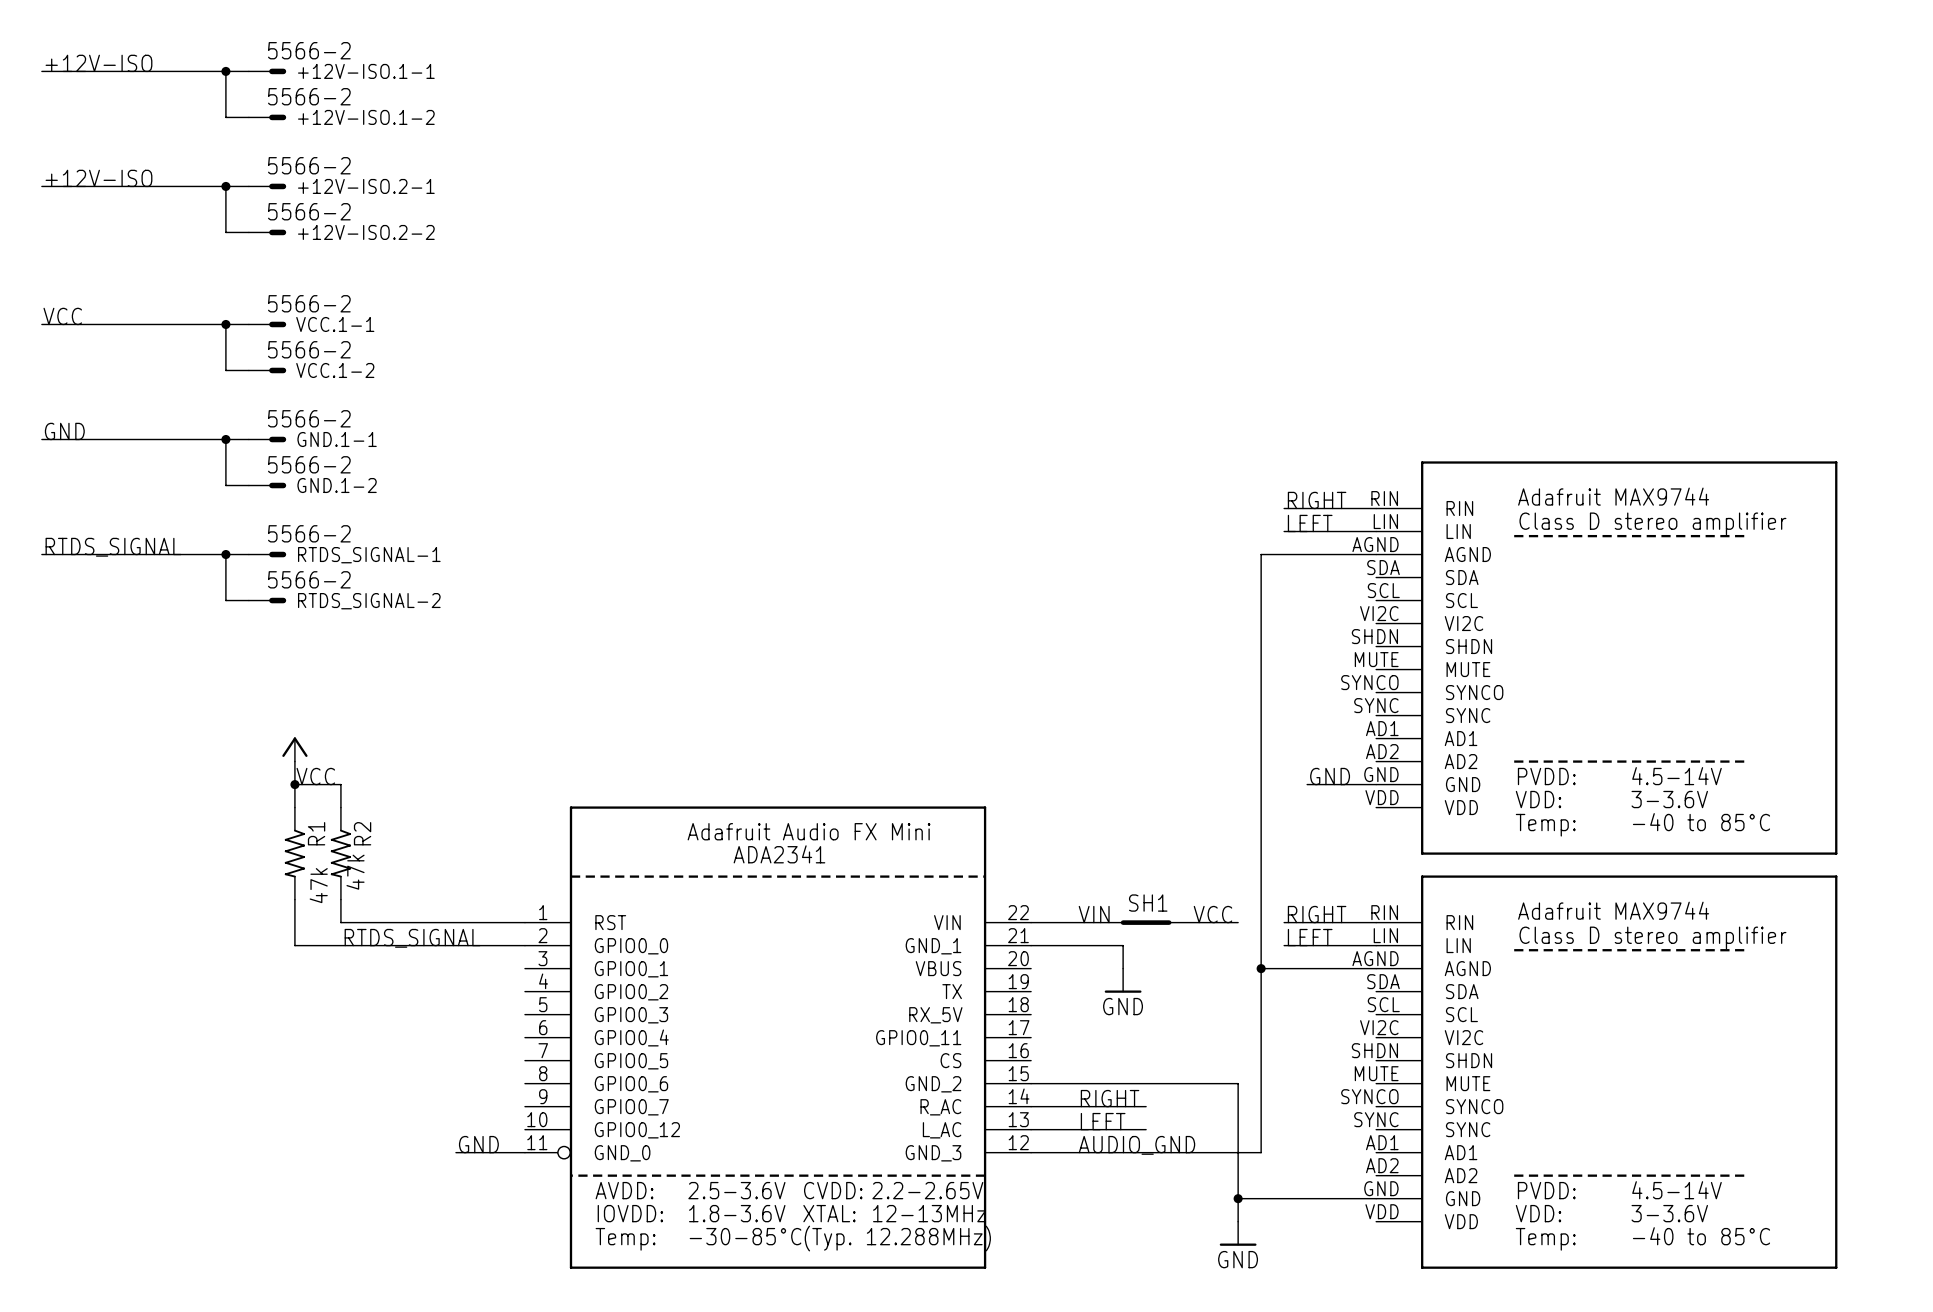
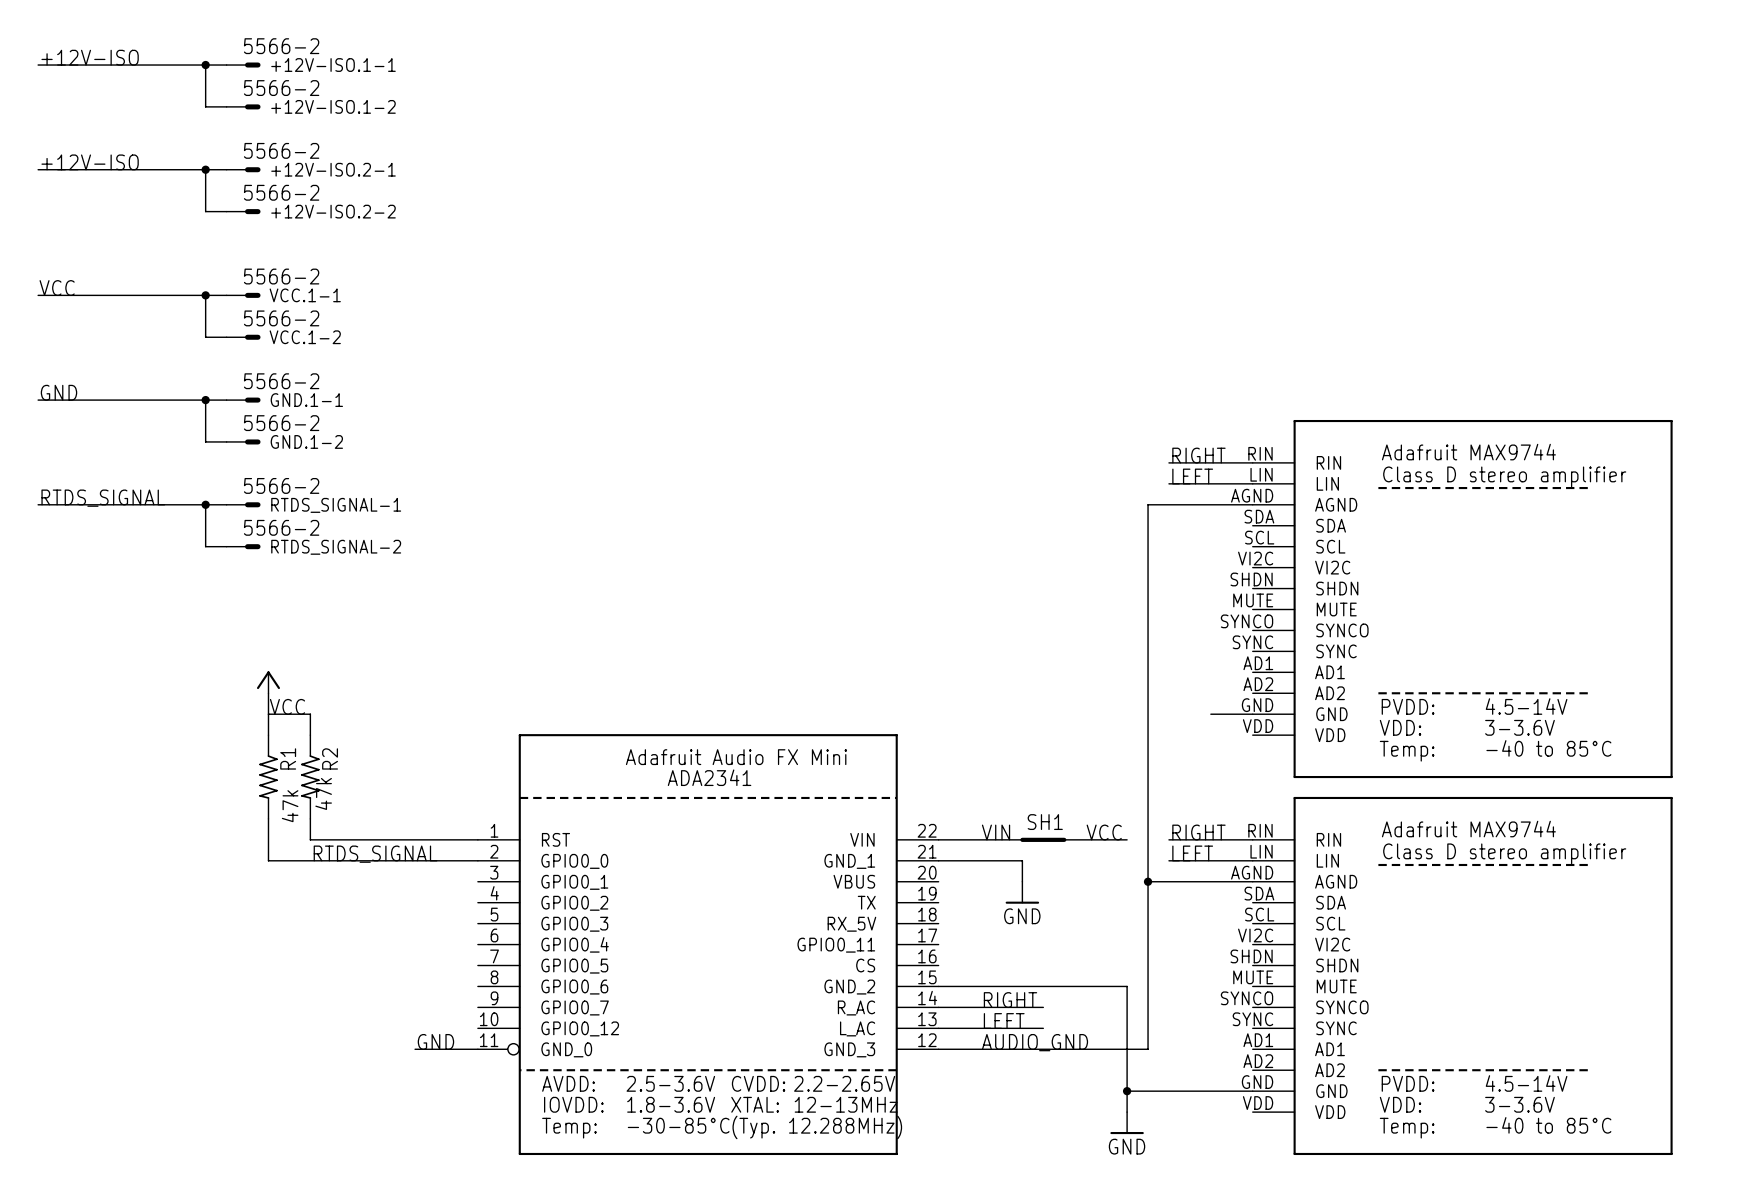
label: GND (1330, 776) -> none
junction: (294, 784) -> none
wire: (1307, 784) (1330, 784) -> none

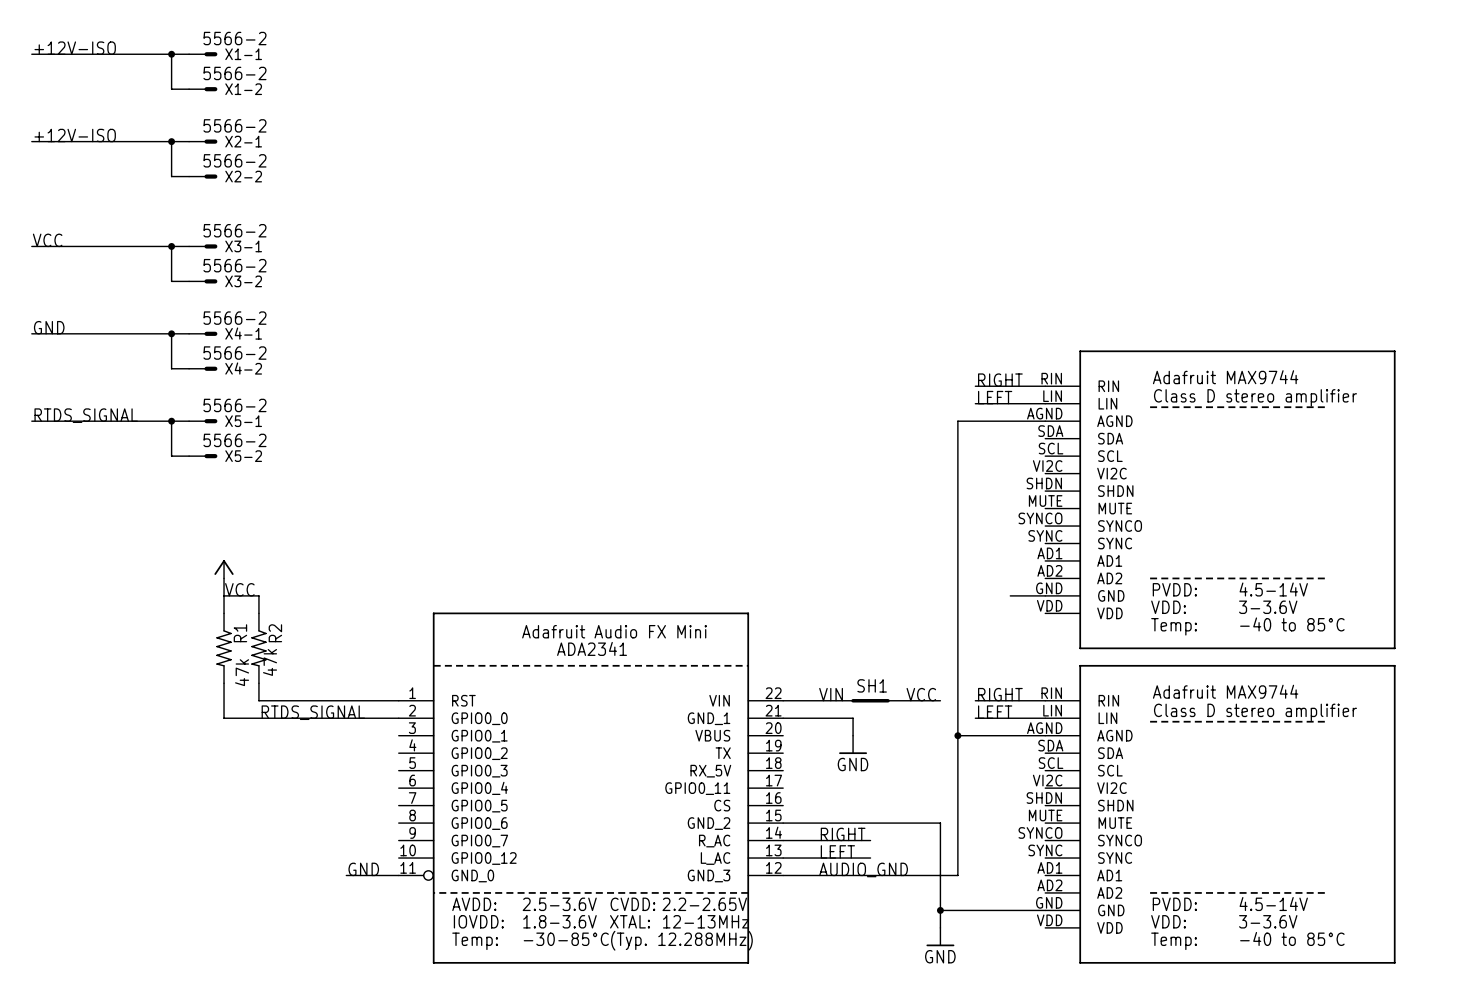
+12V-ISO.1-1 name: +12V-ISO.1-1 (333, 65) -> X1-1 (243, 54)
+12V-ISO.1-2 name: +12V-ISO.1-2 (333, 106) -> X1-2 (243, 89)
+12V-ISO.2-1 name: +12V-ISO.2-1 (333, 169) -> X2-1 (243, 141)
+12V-ISO.2-2 name: +12V-ISO.2-2 (333, 211) -> X2-2 (243, 176)
VCC.1-1 name: VCC.1-1 (305, 295) -> X3-1 (243, 246)
VCC.1-2 name: VCC.1-2 (305, 337) -> X3-2 (243, 281)
GND.1-1 name: GND.1-1 (306, 400) -> X4-1 (243, 333)
GND.1-2 name: GND.1-2 (306, 441) -> X4-2 (243, 368)
RTDS_SIGNAL-1 name: RTDS_SIGNAL-1 (336, 505) -> X5-1 (243, 421)
RTDS_SIGNAL-2 name: RTDS_SIGNAL-2 (336, 547) -> X5-2 (243, 456)

